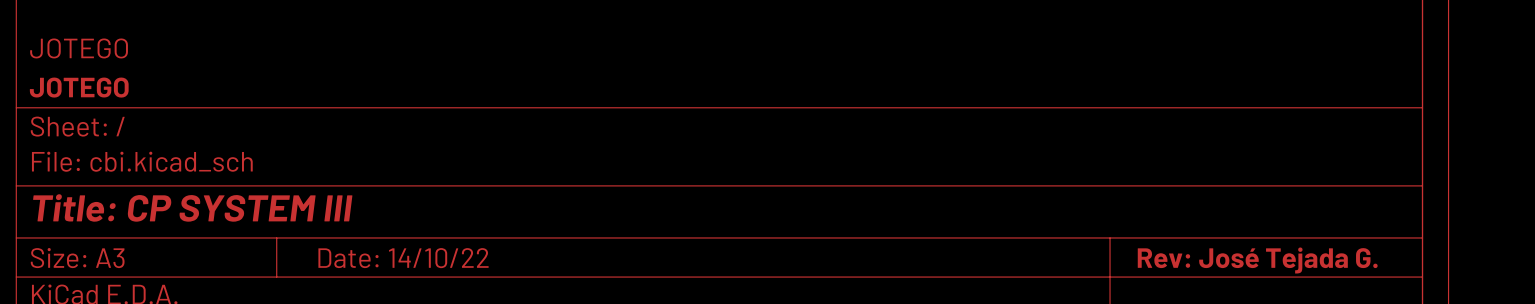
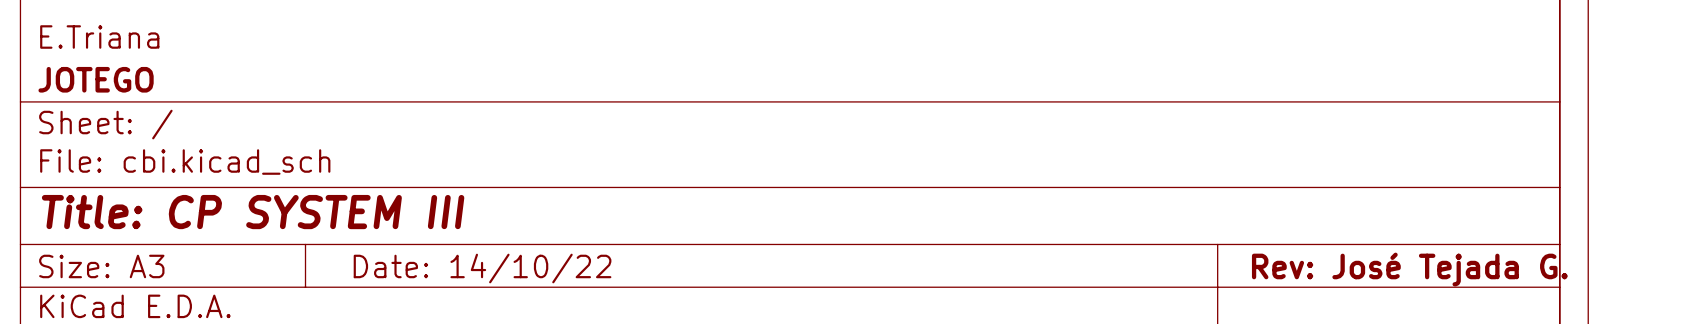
title block: JOTEGO (79, 48) -> E.Triana (99, 37)

